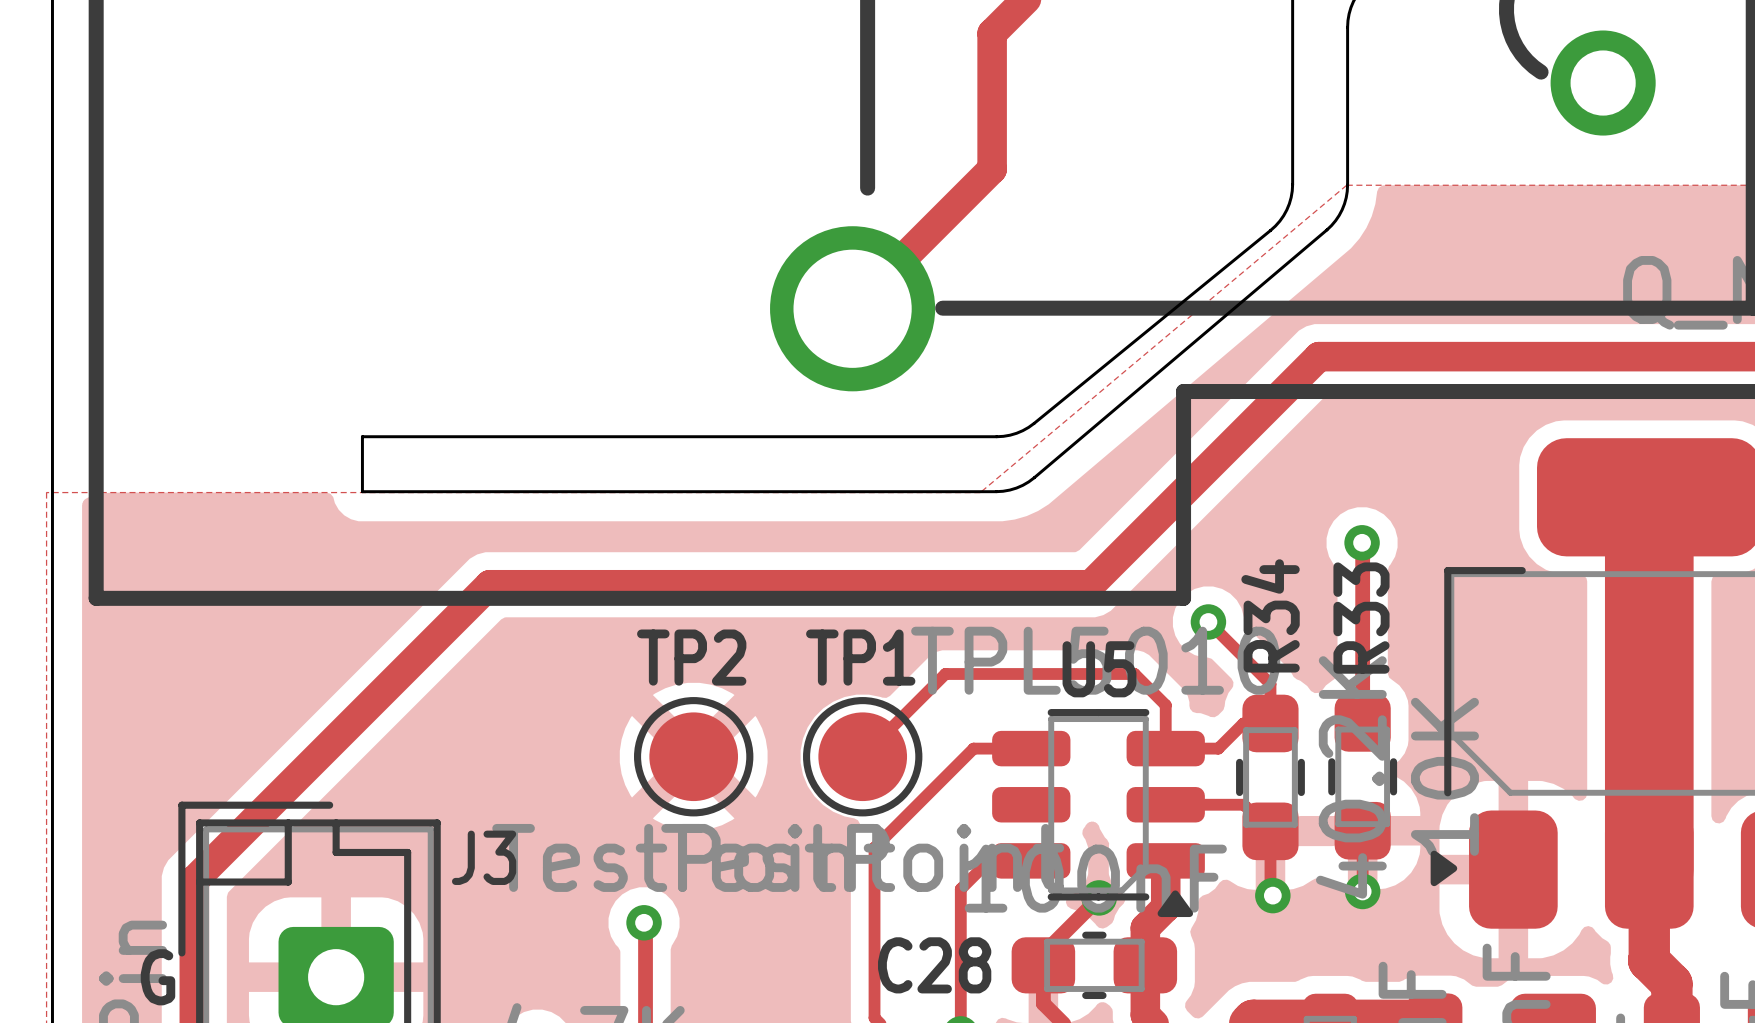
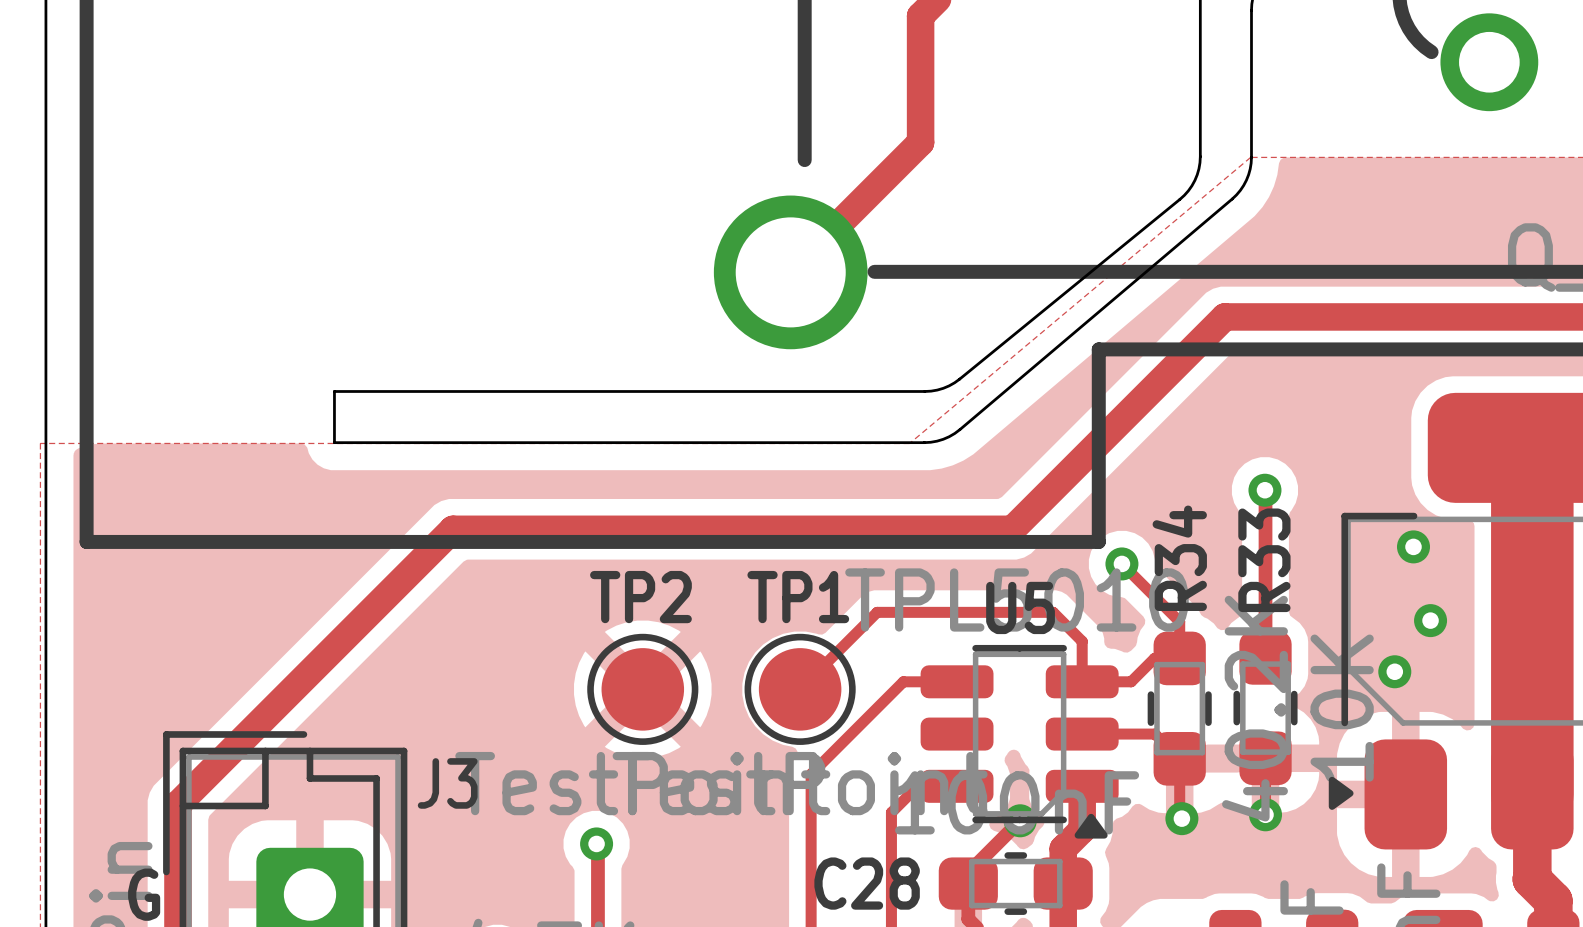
via: none -> (1413, 546)
via: none -> (1430, 620)
via: none -> (1394, 671)

